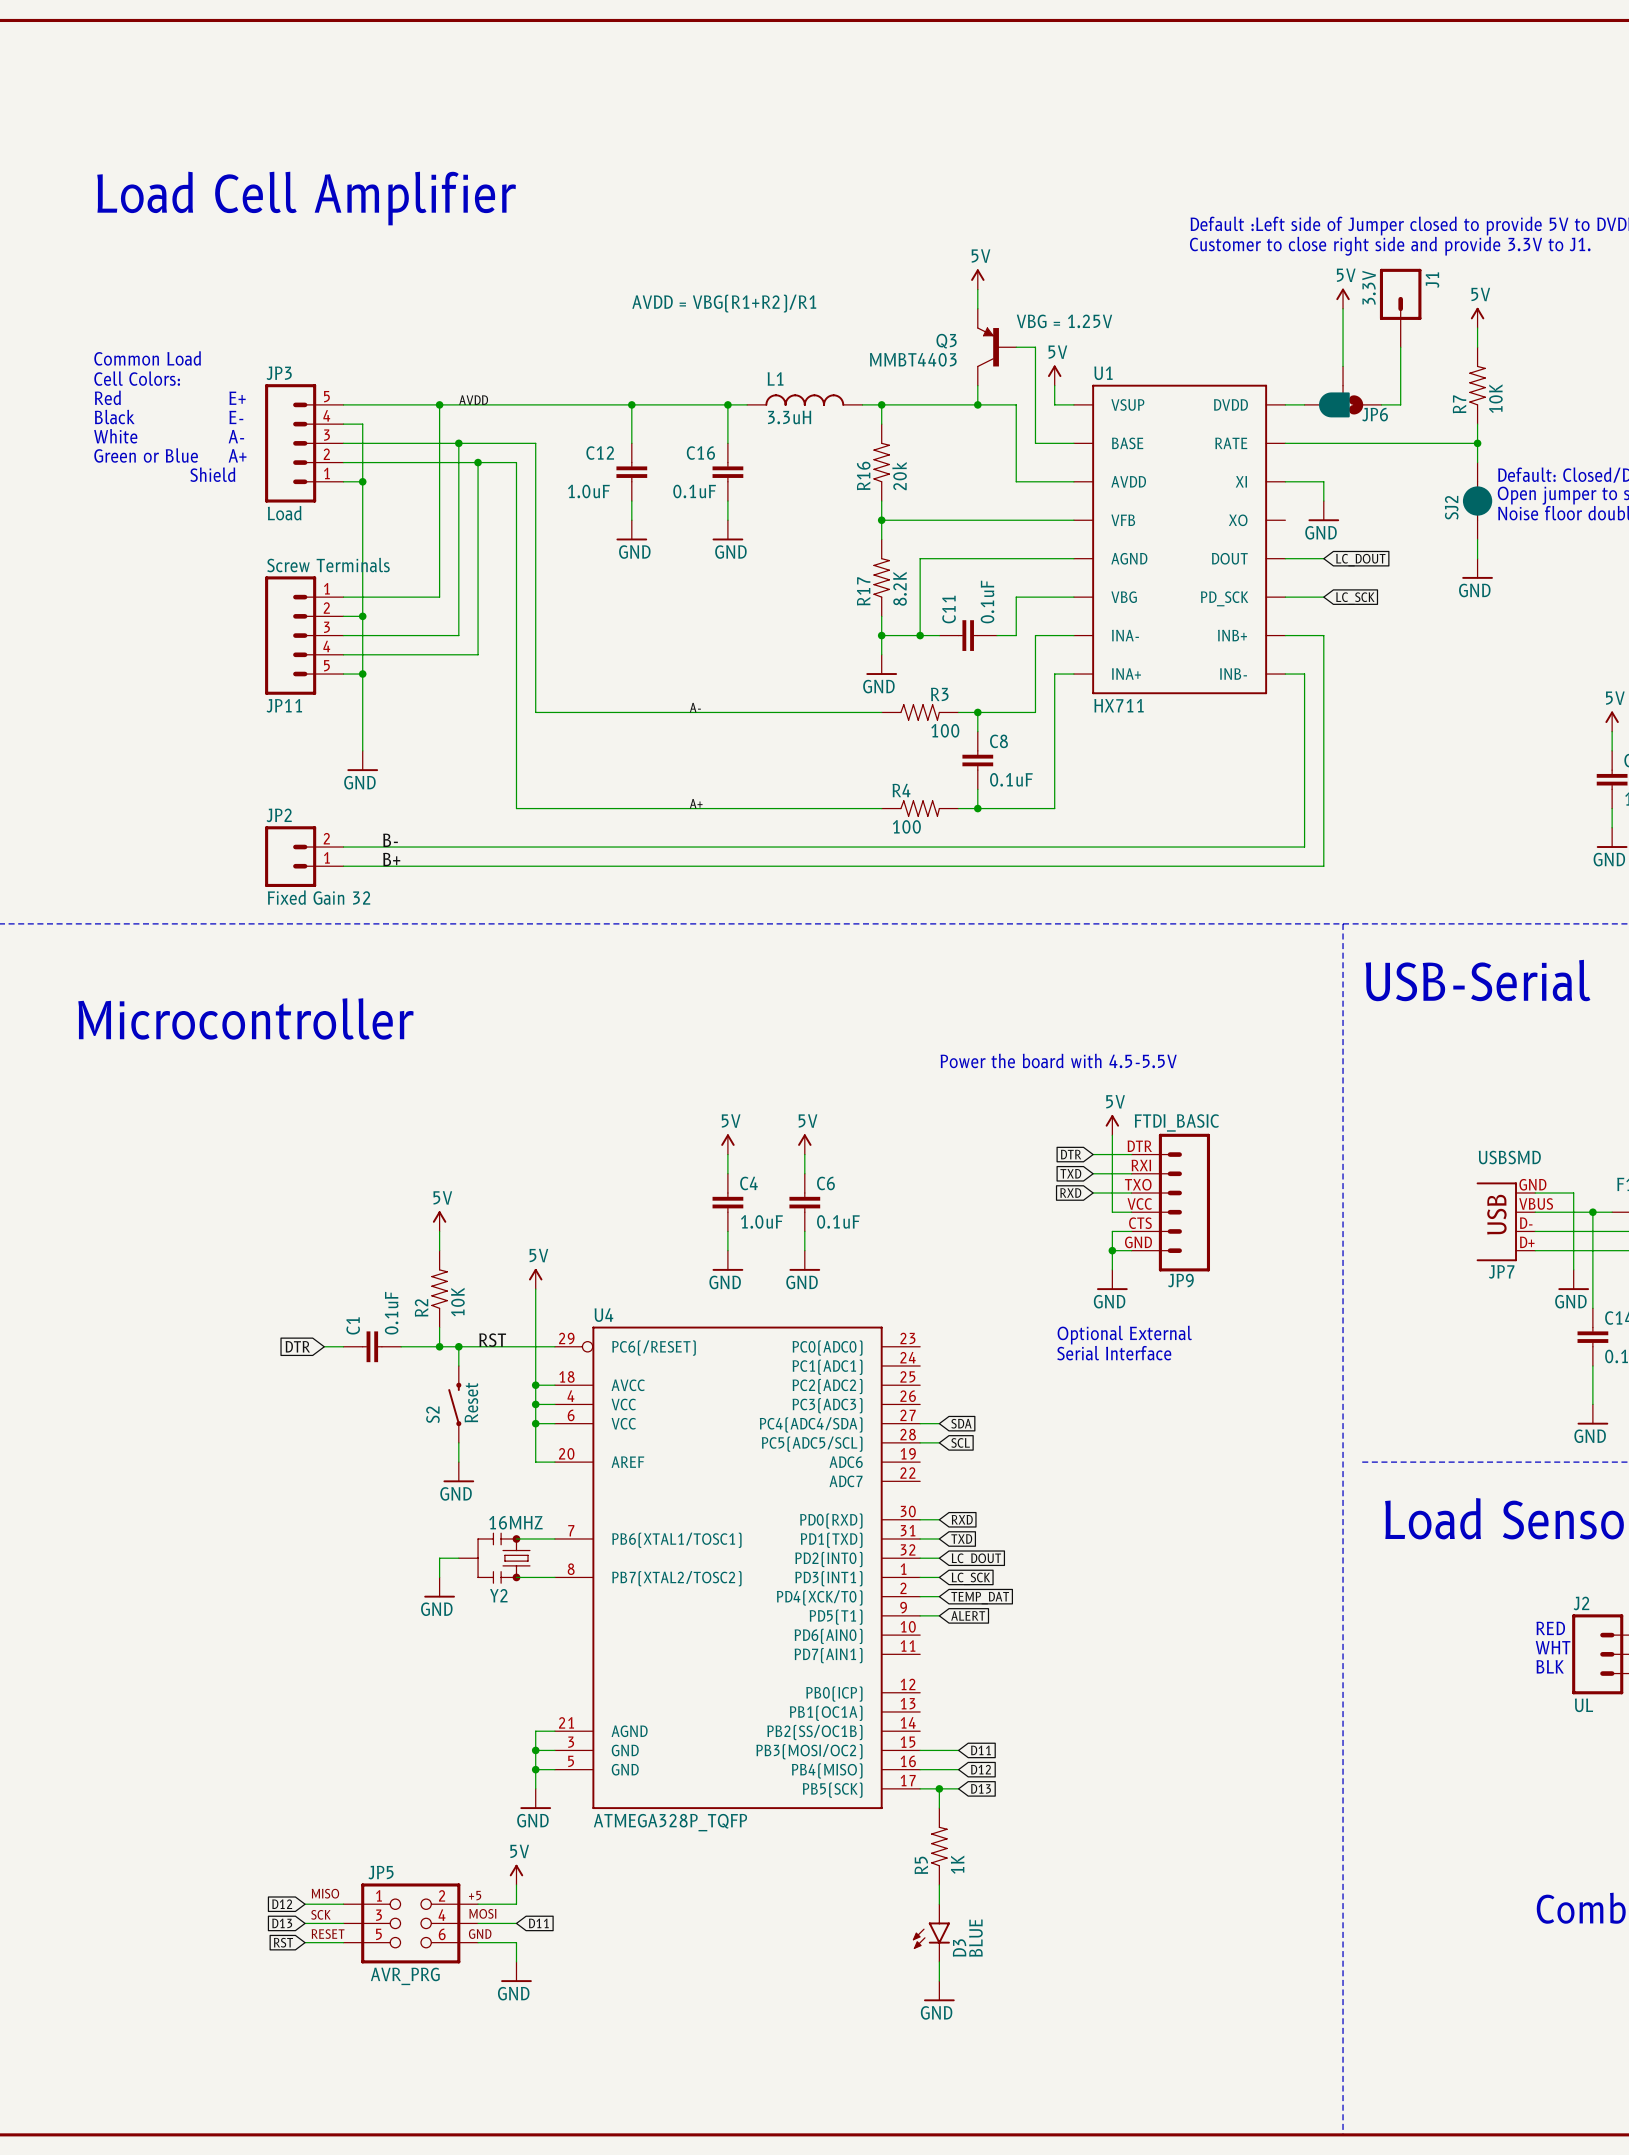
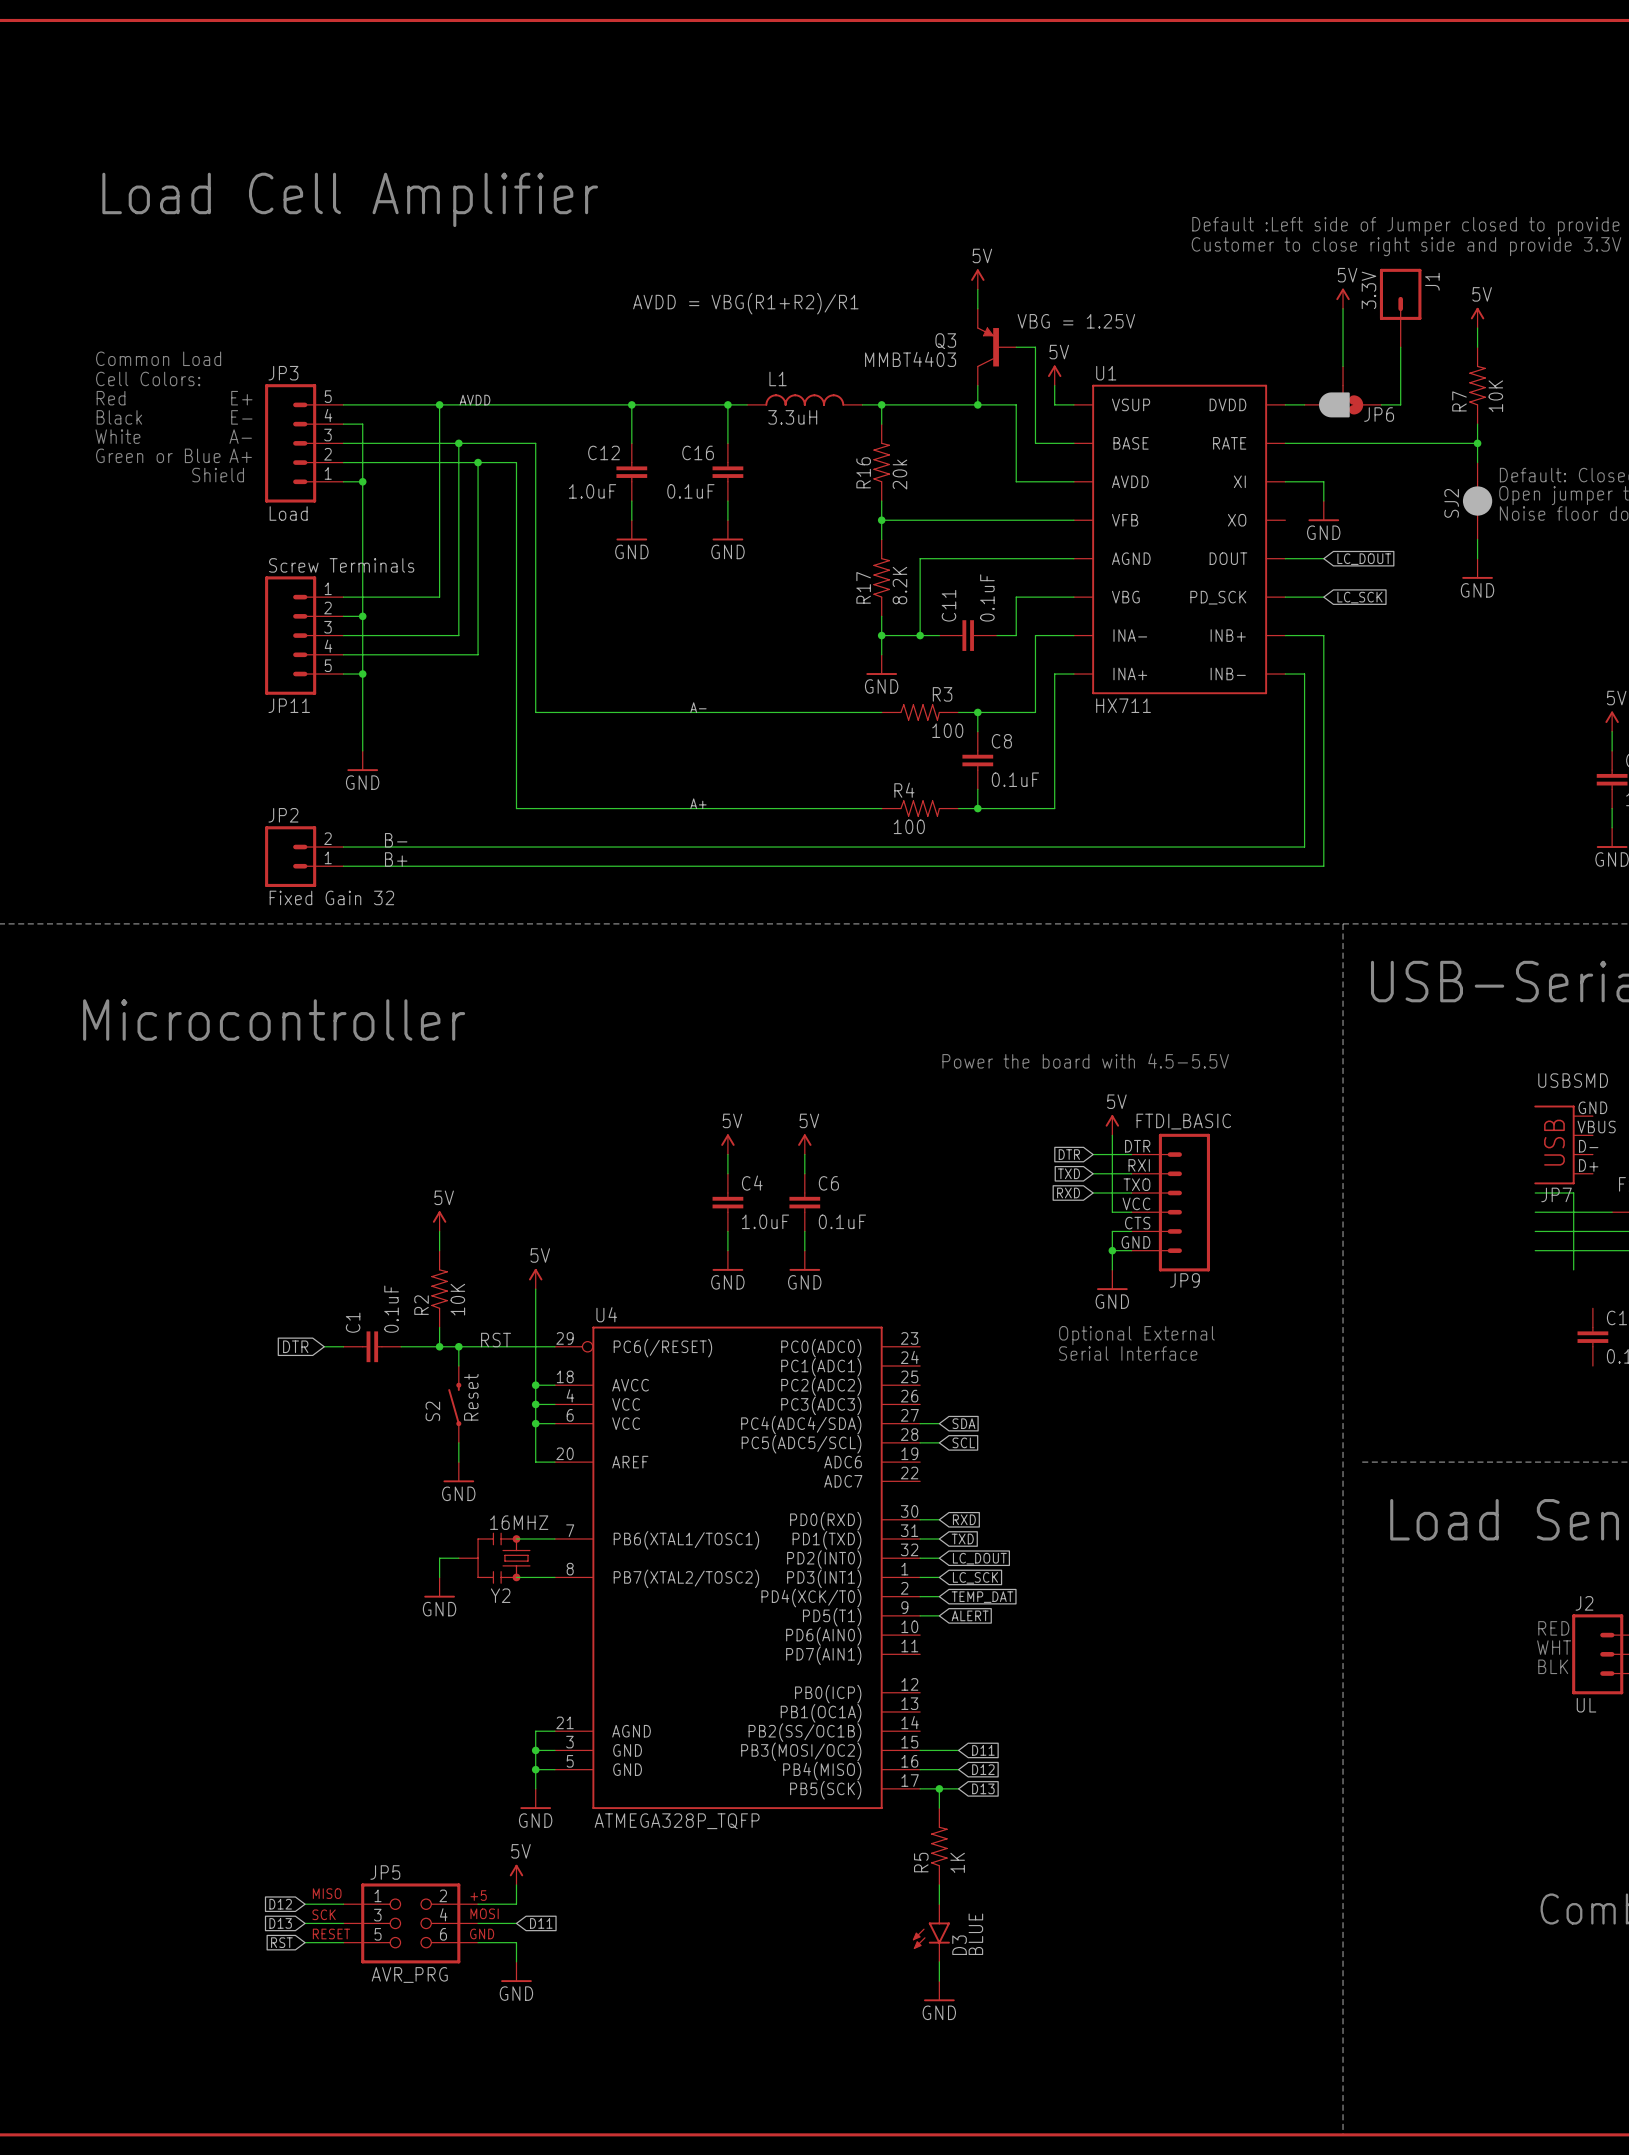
wire: (1592, 1212) (1592, 1308) -> none
junction: (1592, 1212) -> none
JP7 position: (1505, 1221) -> (1563, 1144)
power symbol: GND (1573, 1279) -> none
wire: (1592, 1365) (1592, 1404) -> none
power symbol: GND (1592, 1414) -> none

